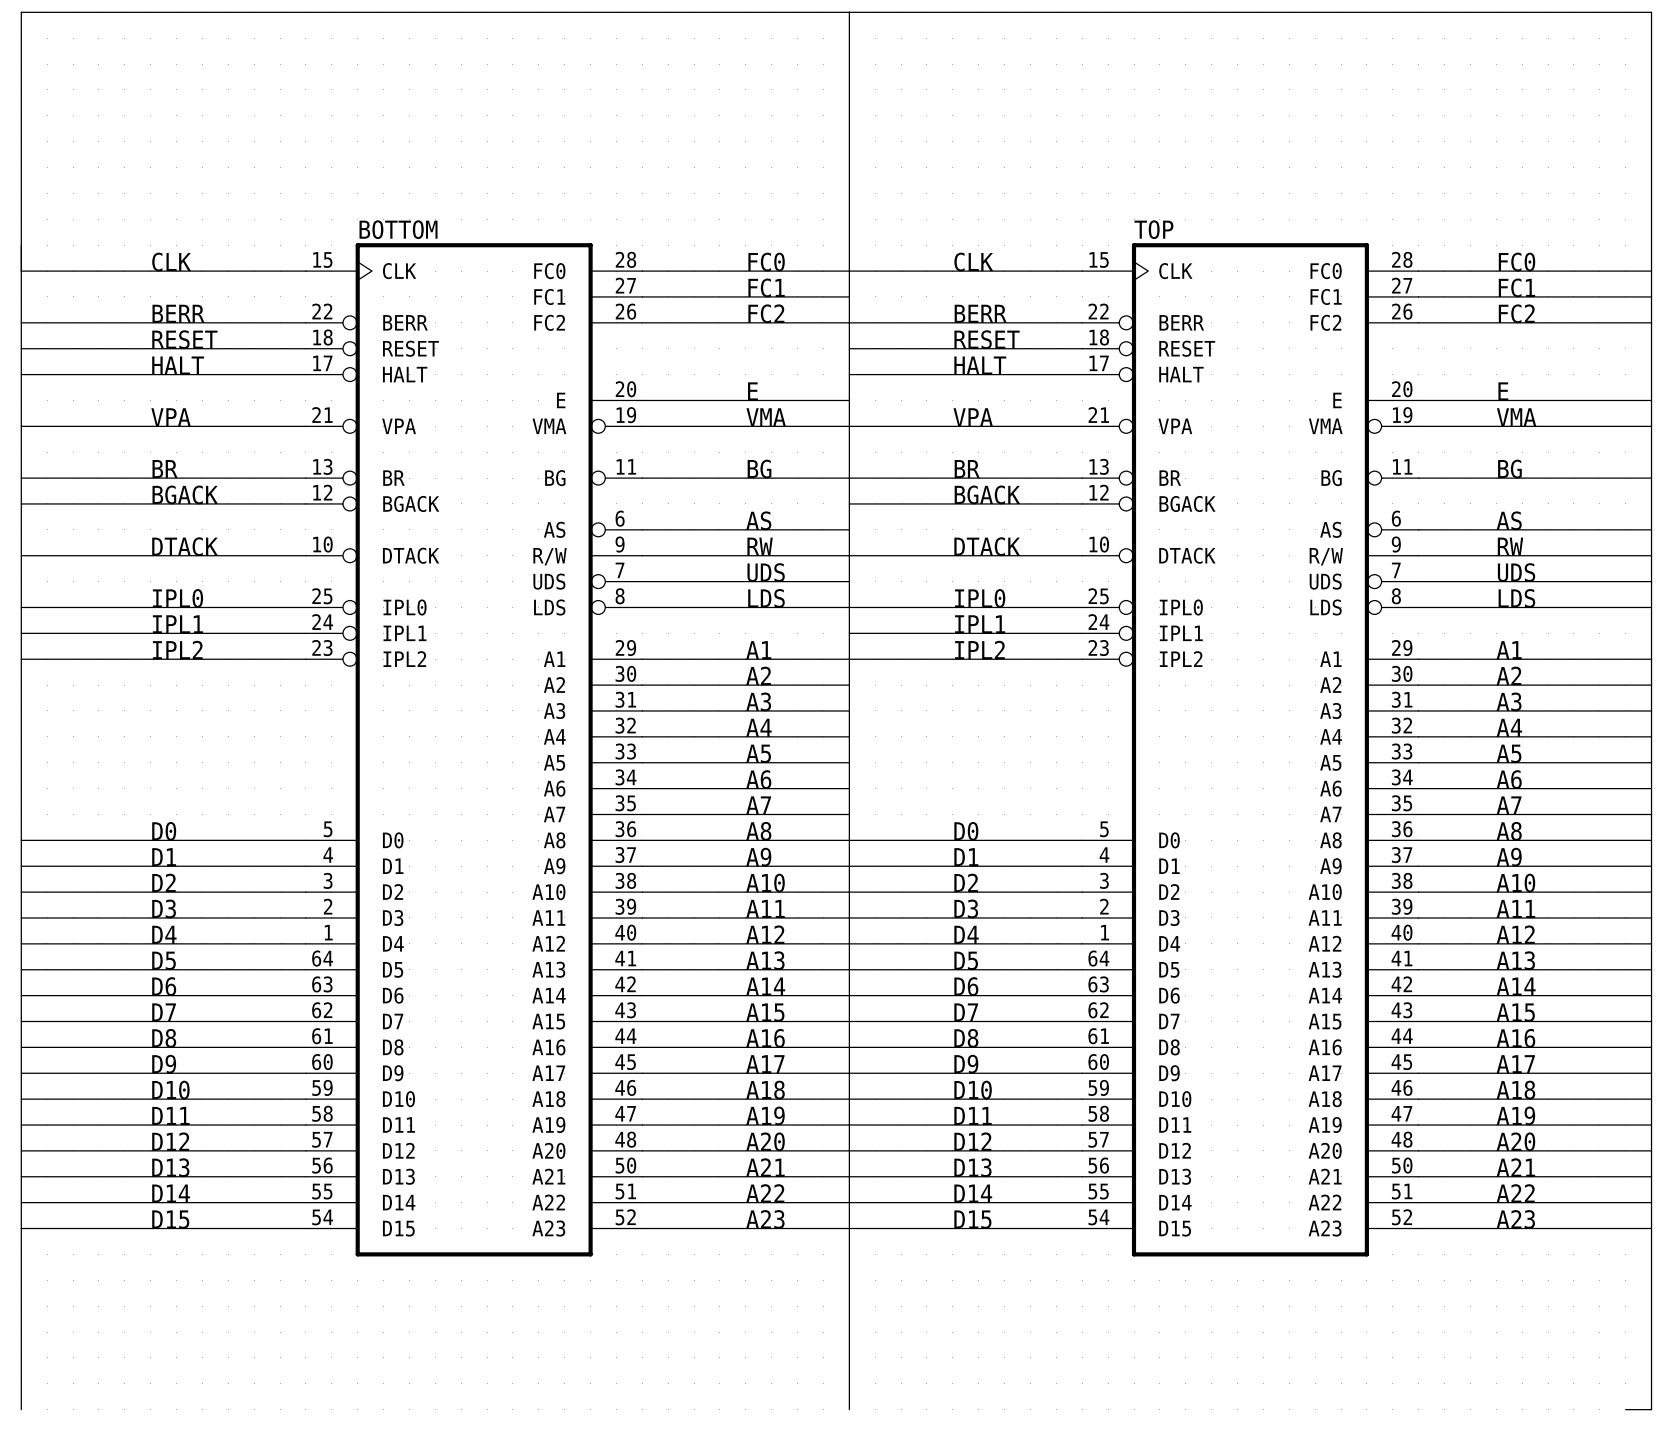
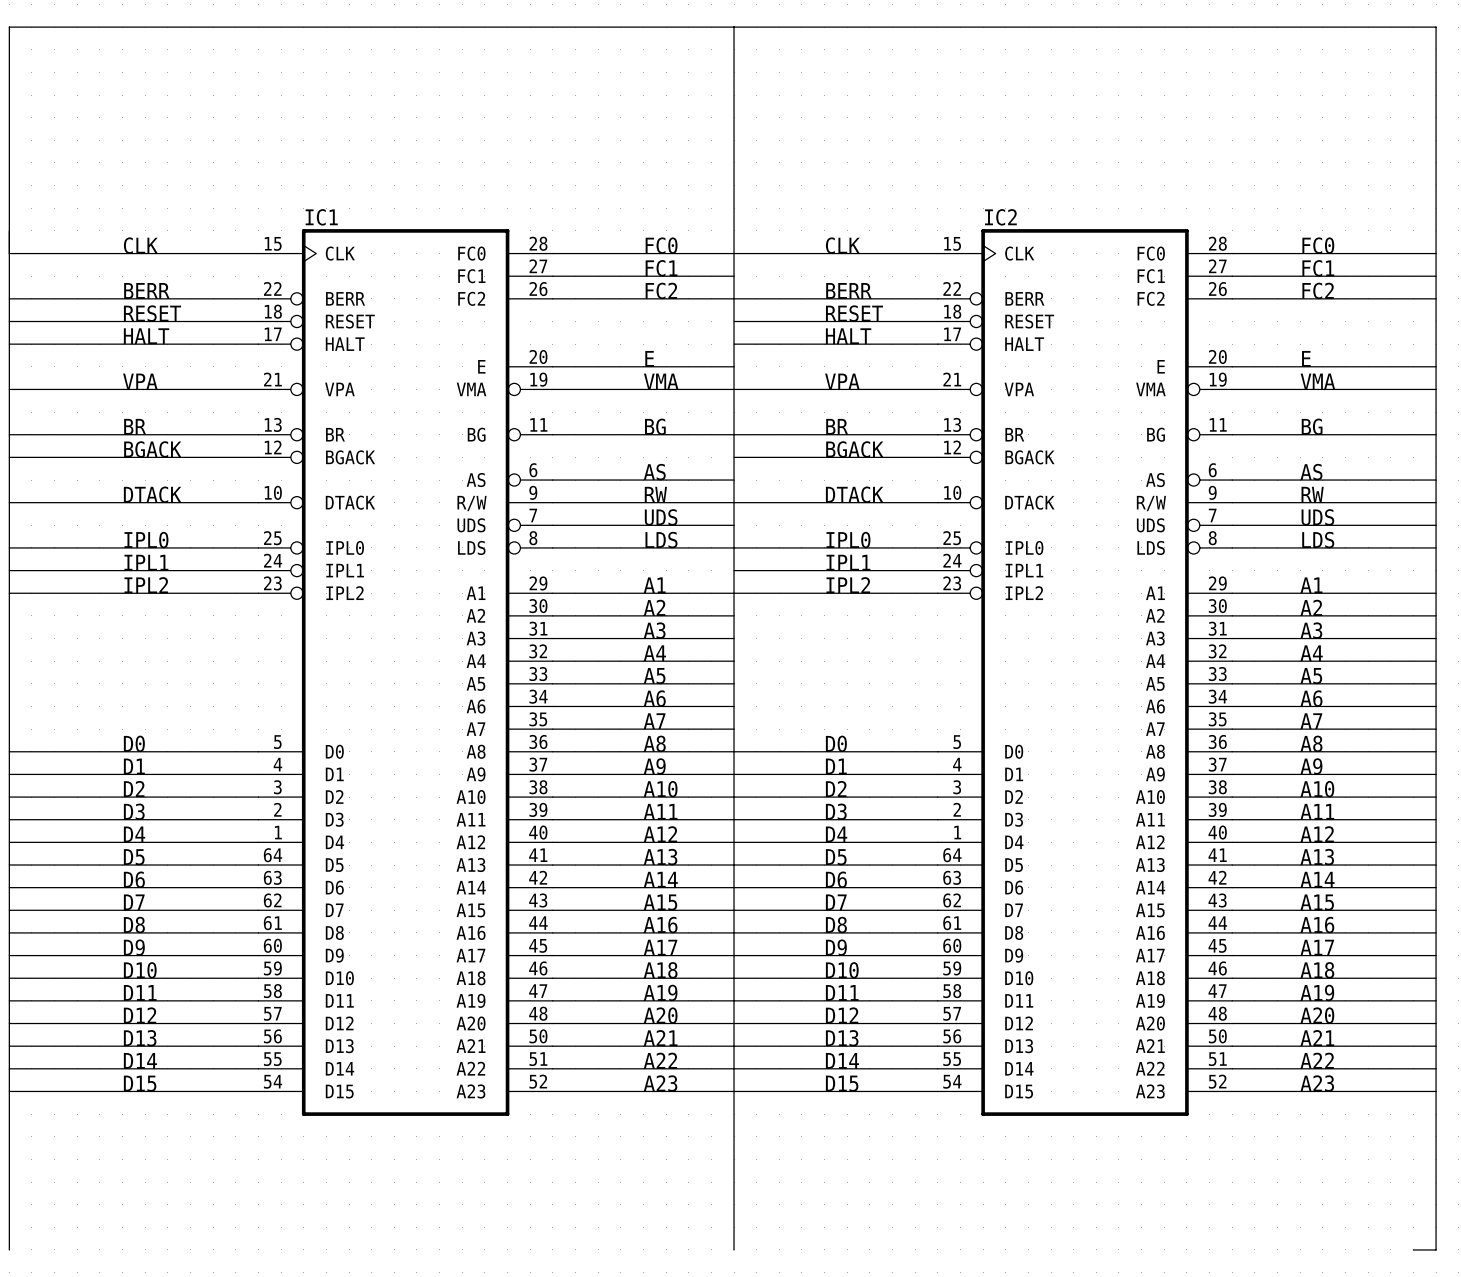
BOTTOM name: BOTTOM (398, 229) -> IC1 (321, 217)
TOP name: TOP (1153, 229) -> IC2 (1000, 217)

